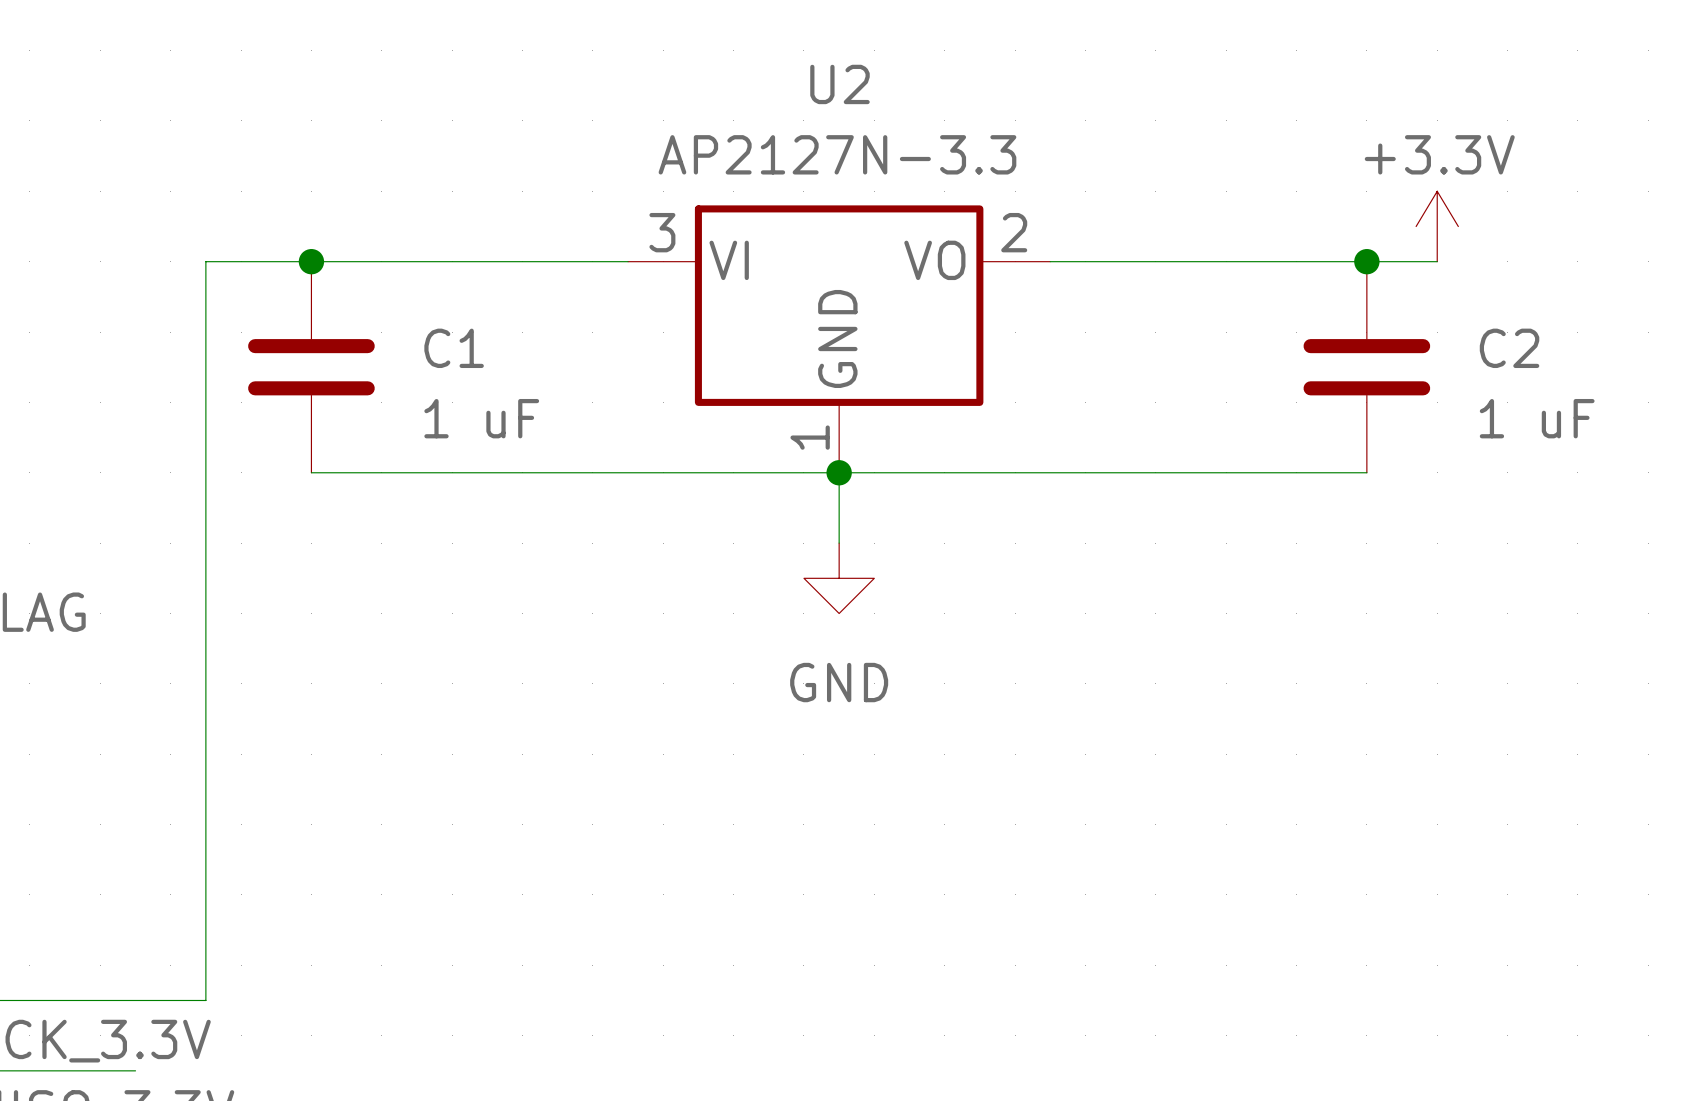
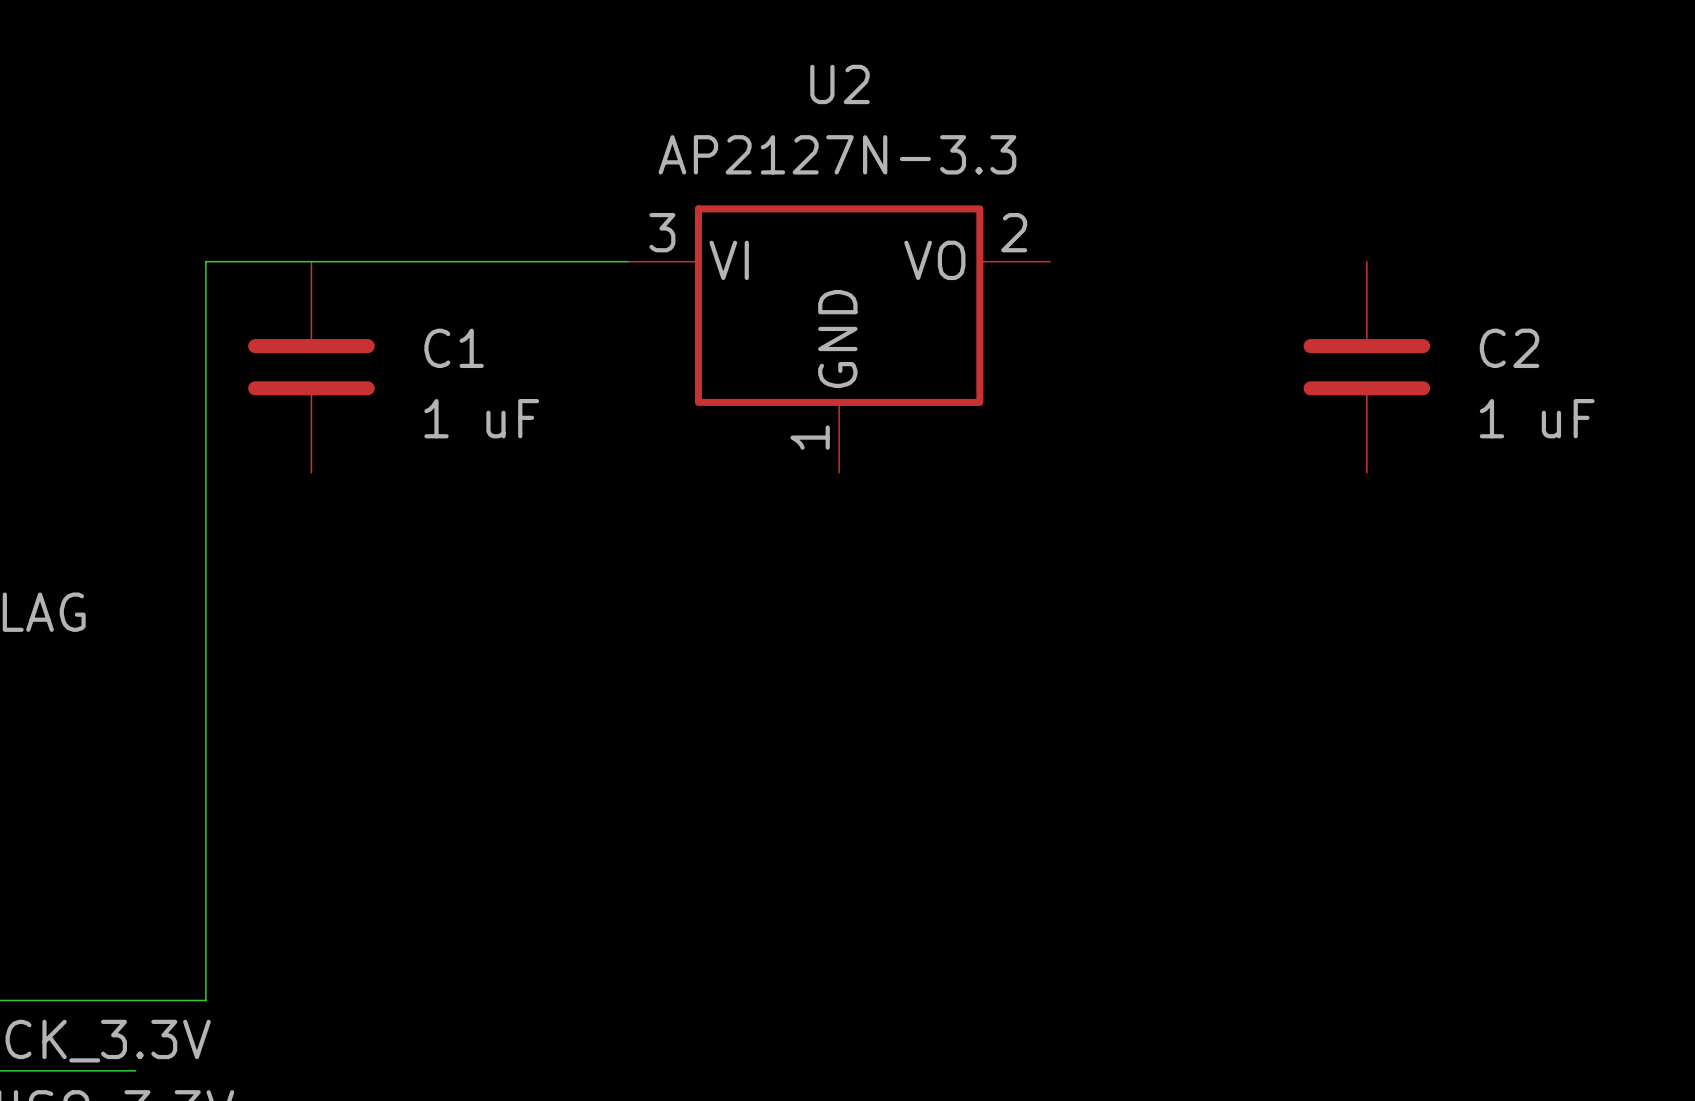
power symbol: +3.3V (1437, 226) -> none
junction: (311, 261) -> none
wire: (1050, 261) (1437, 261) -> none
junction: (1366, 261) -> none
wire: (311, 472) (1366, 472) -> none
wire: (839, 472) (839, 543) -> none
junction: (839, 472) -> none
power symbol: GND (839, 578) -> none

